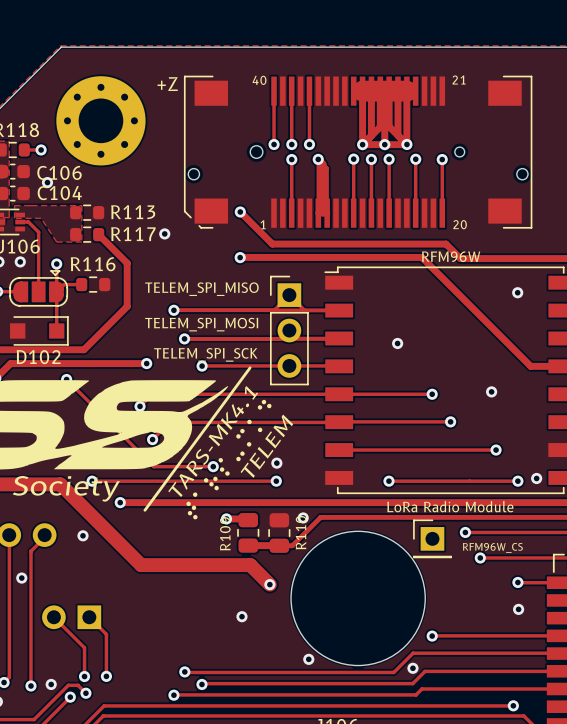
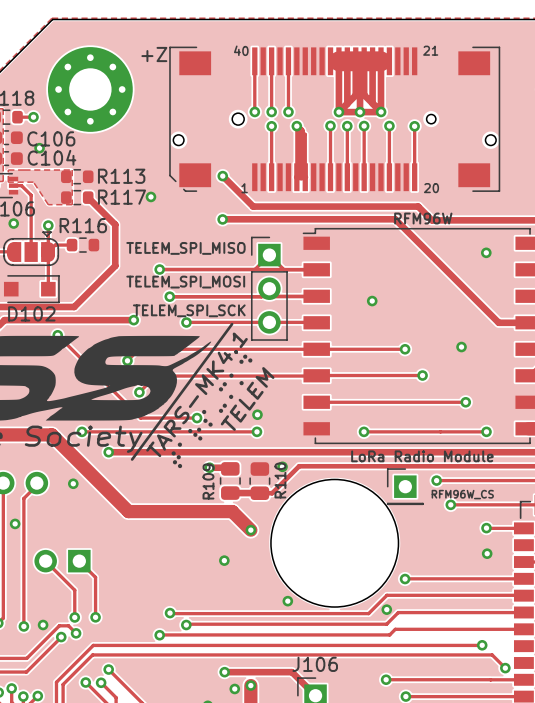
via: (536, 478) -> none

